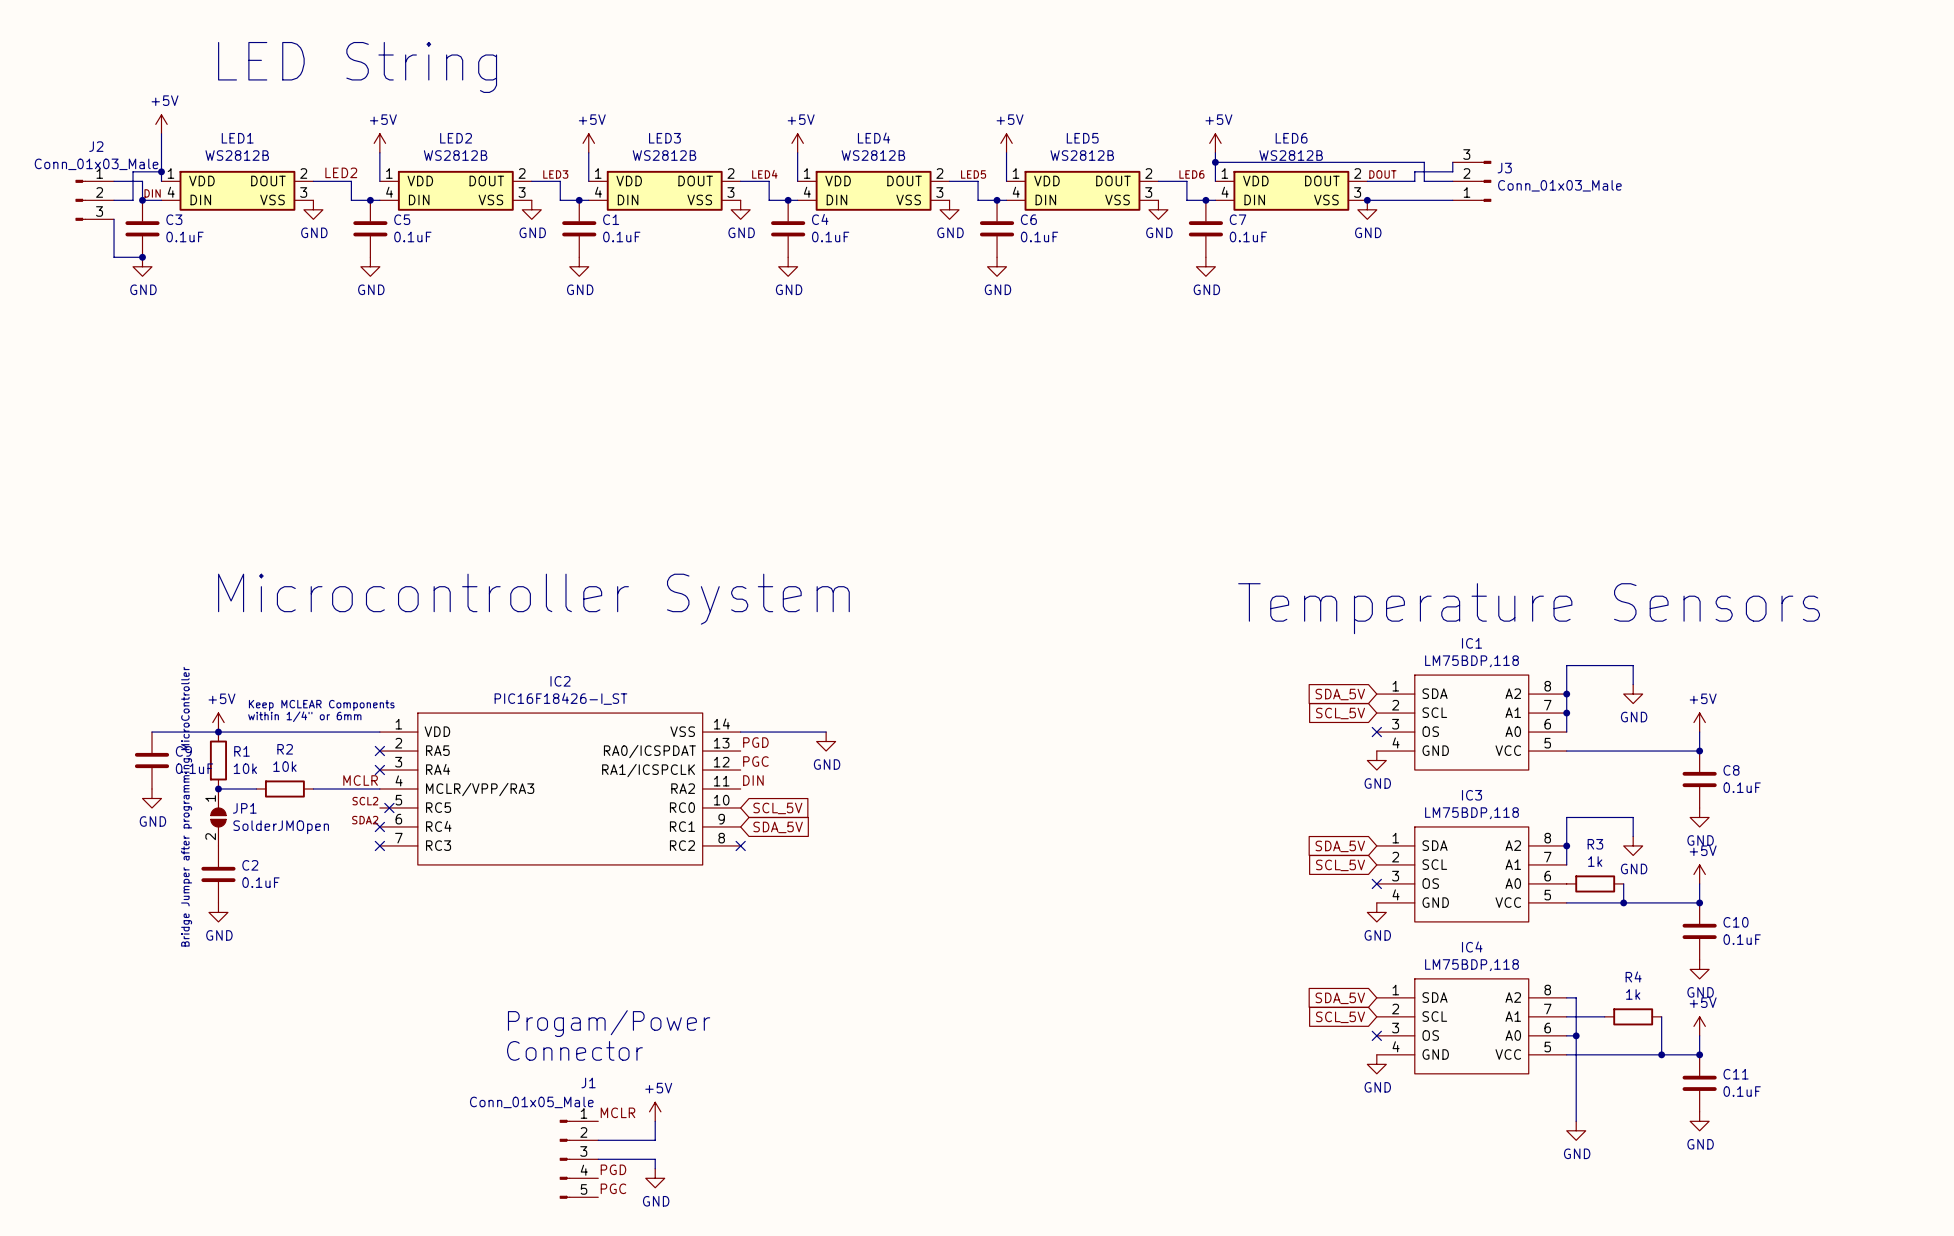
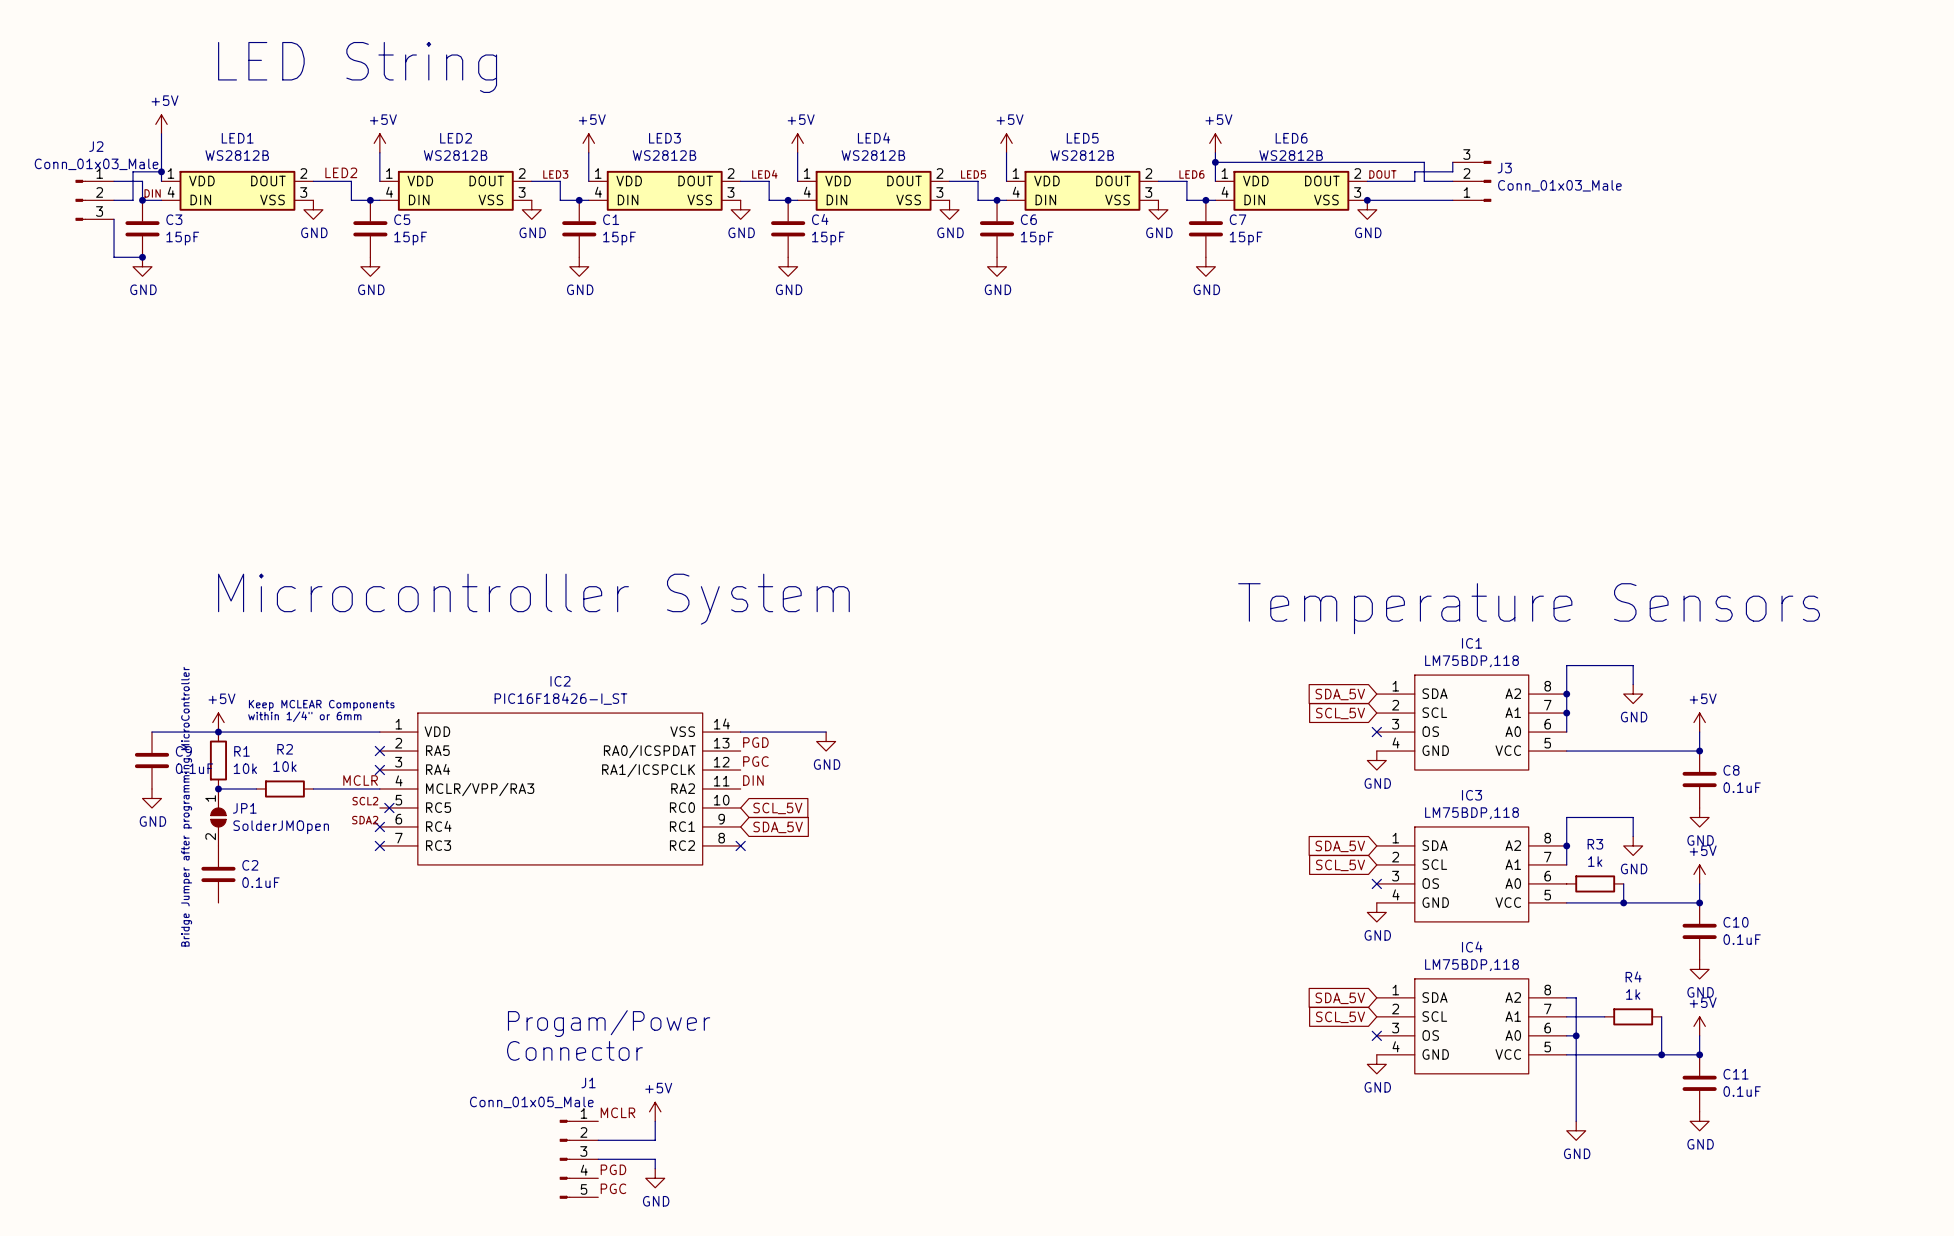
C3 value: 0.1uF (184, 237) -> 15pF (182, 238)
C5 value: 0.1uF (412, 237) -> 15pF (410, 238)
C1 value: 0.1uF (621, 237) -> 15pF (619, 238)
C4 value: 0.1uF (830, 237) -> 15pF (828, 238)
C6 value: 0.1uF (1039, 237) -> 15pF (1037, 238)
C7 value: 0.1uF (1248, 237) -> 15pF (1246, 238)
power symbol: GND (218, 912) -> none

